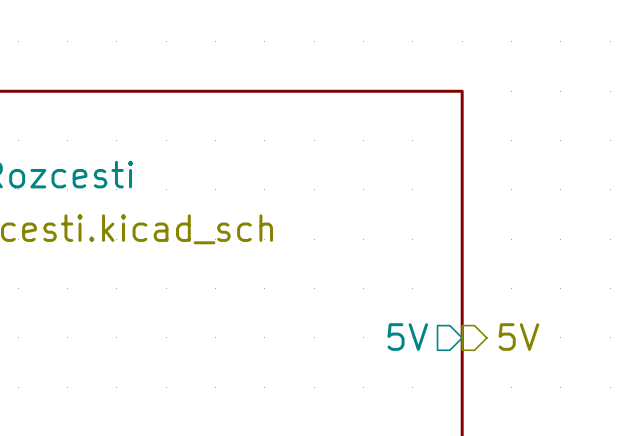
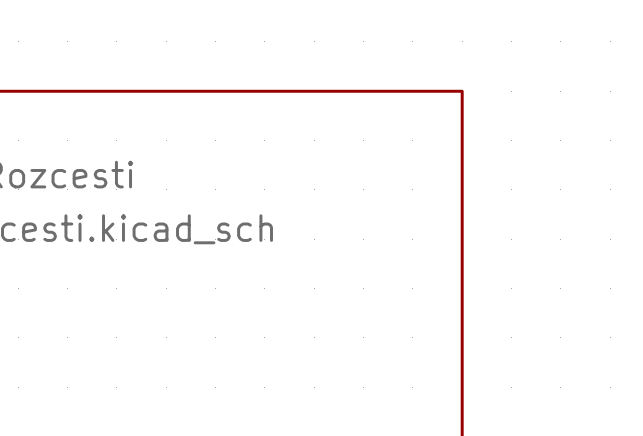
sheet pin: 5V (407, 337) -> none
hierarchical label: 5V (518, 337) -> none

